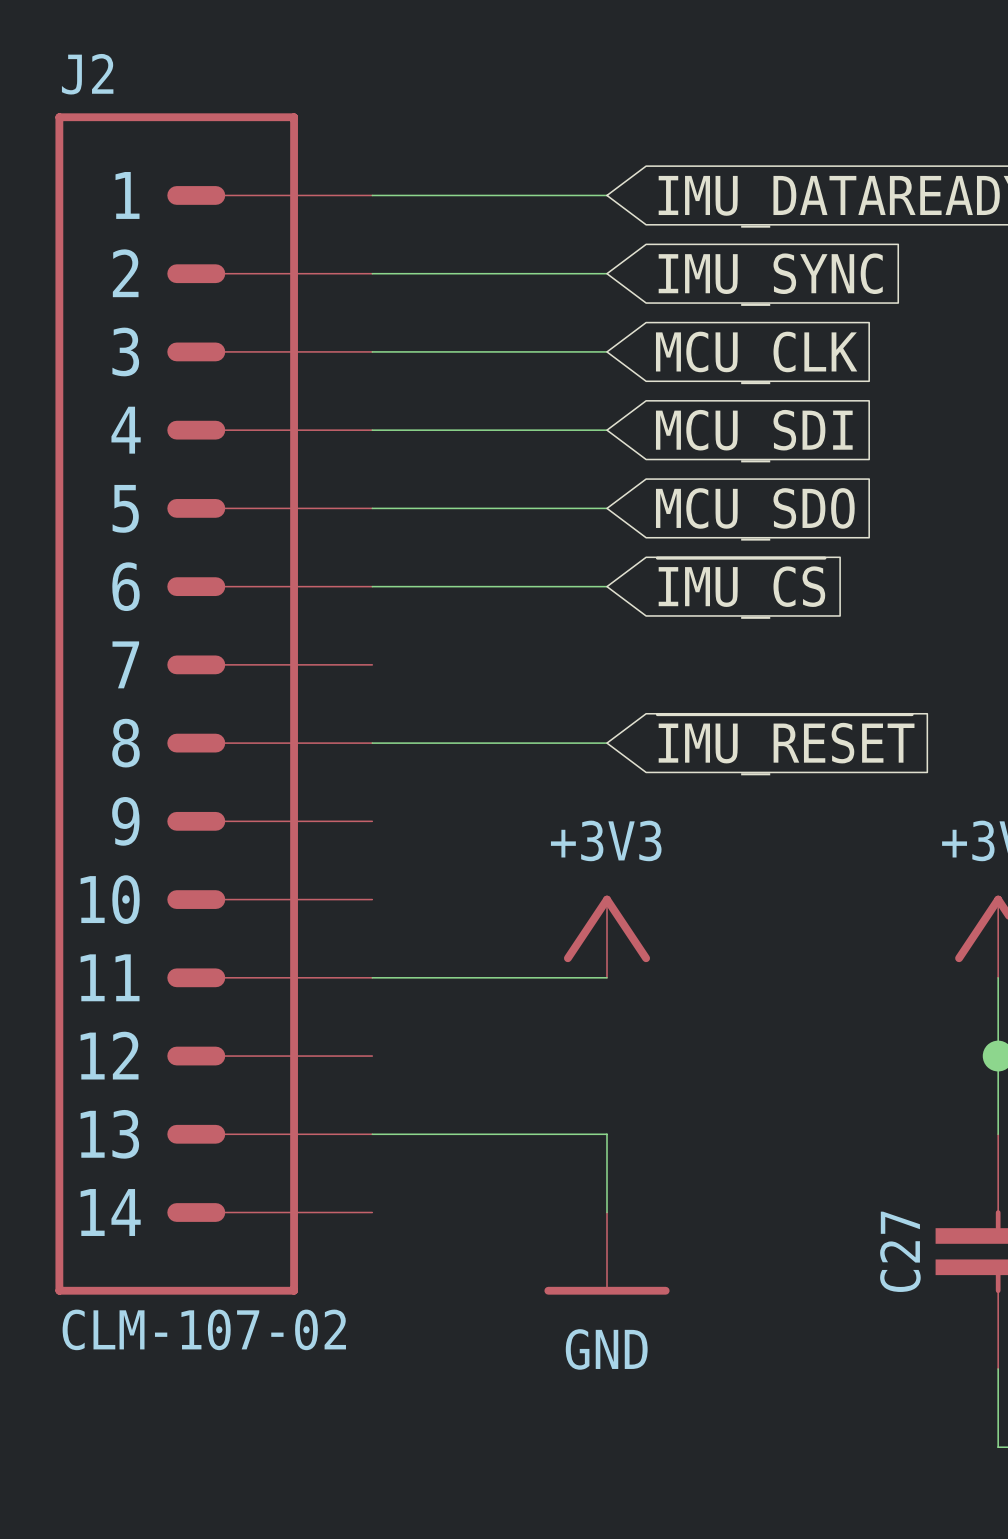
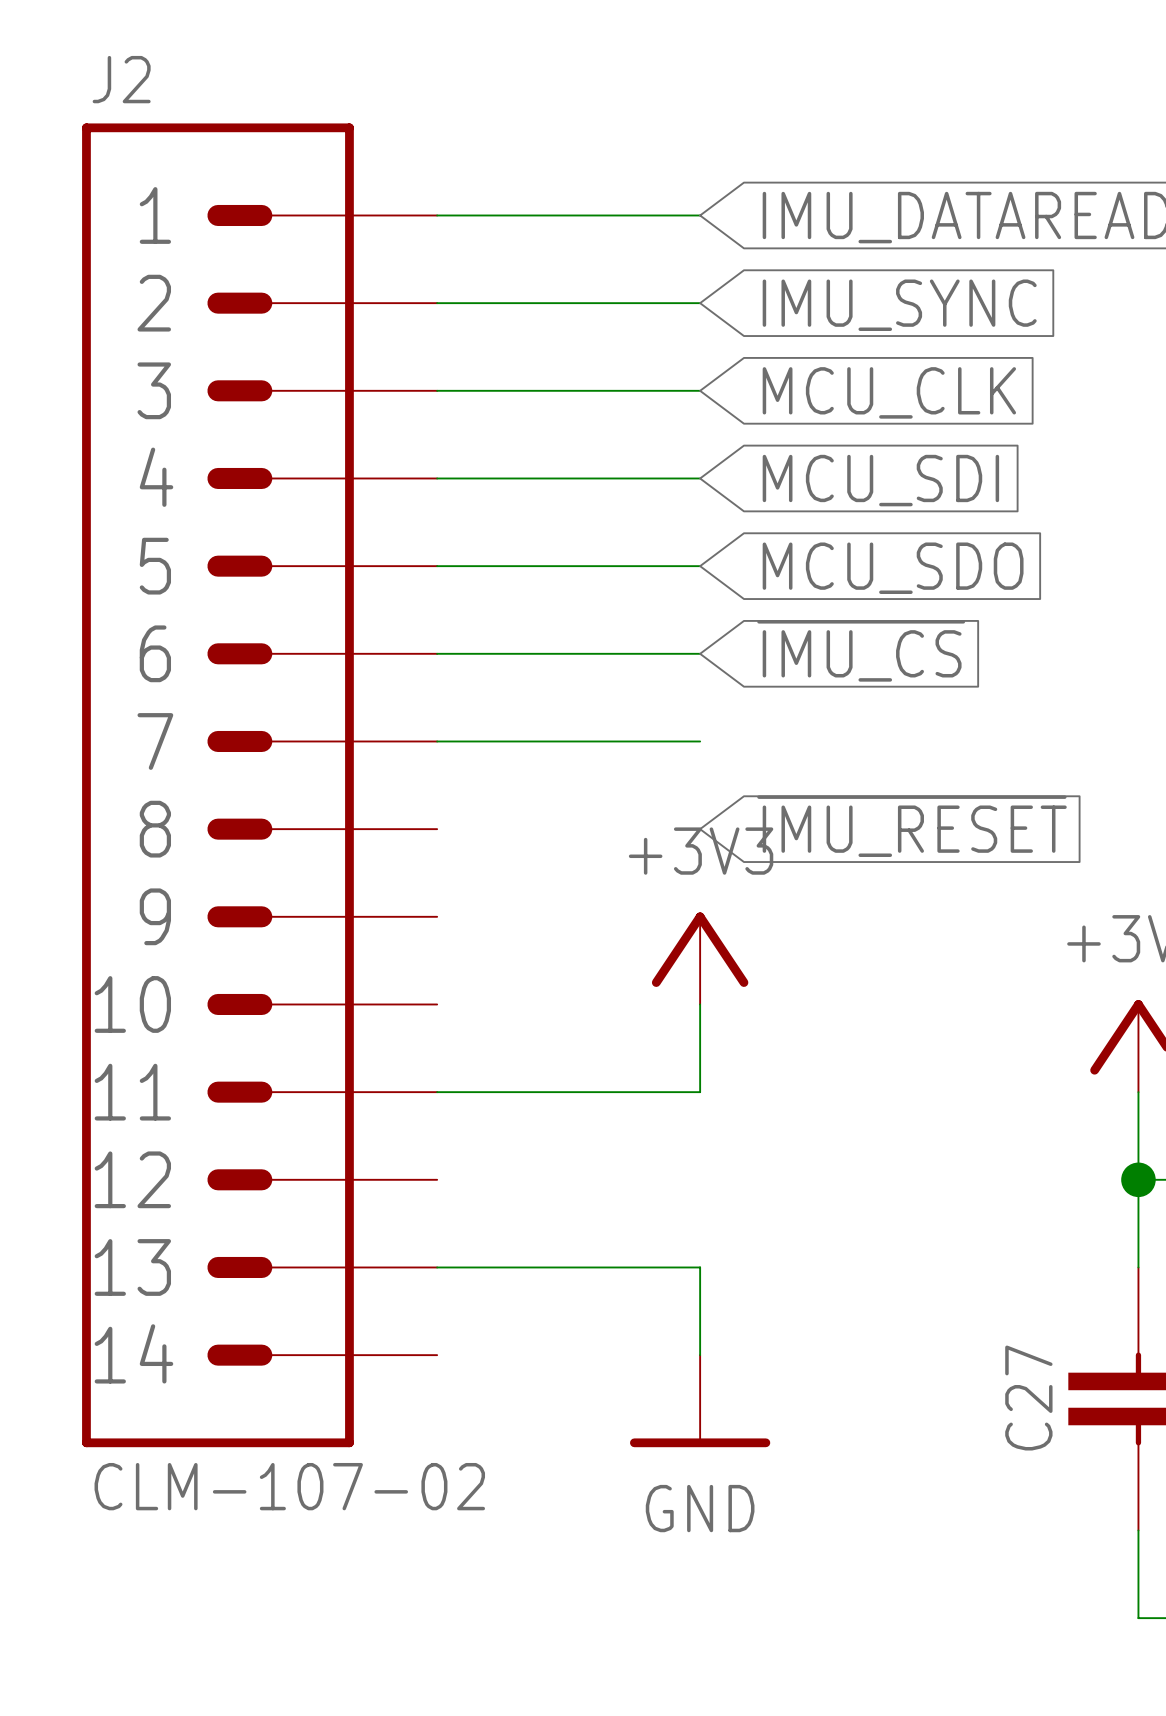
wire: (372, 743) (607, 743) -> (437, 741) (700, 741)
power symbol position: +3V3 (607, 936) -> +3V3 (700, 958)

